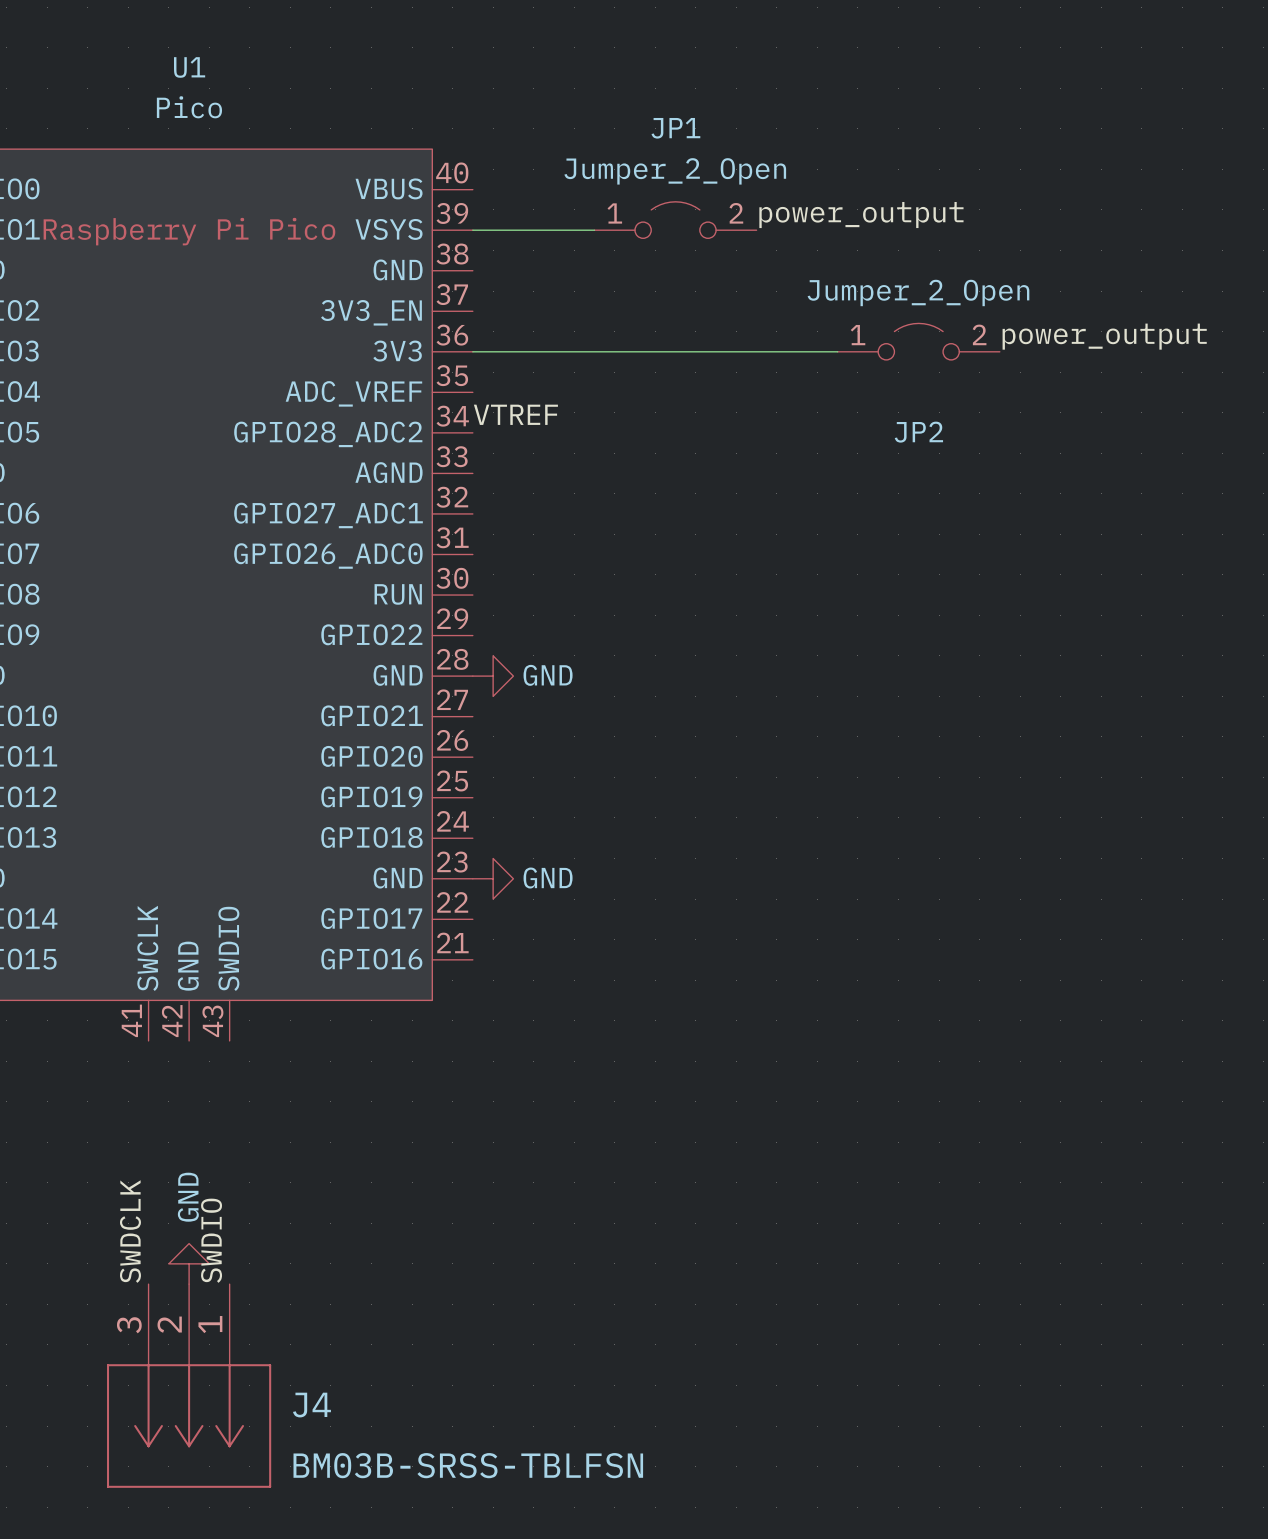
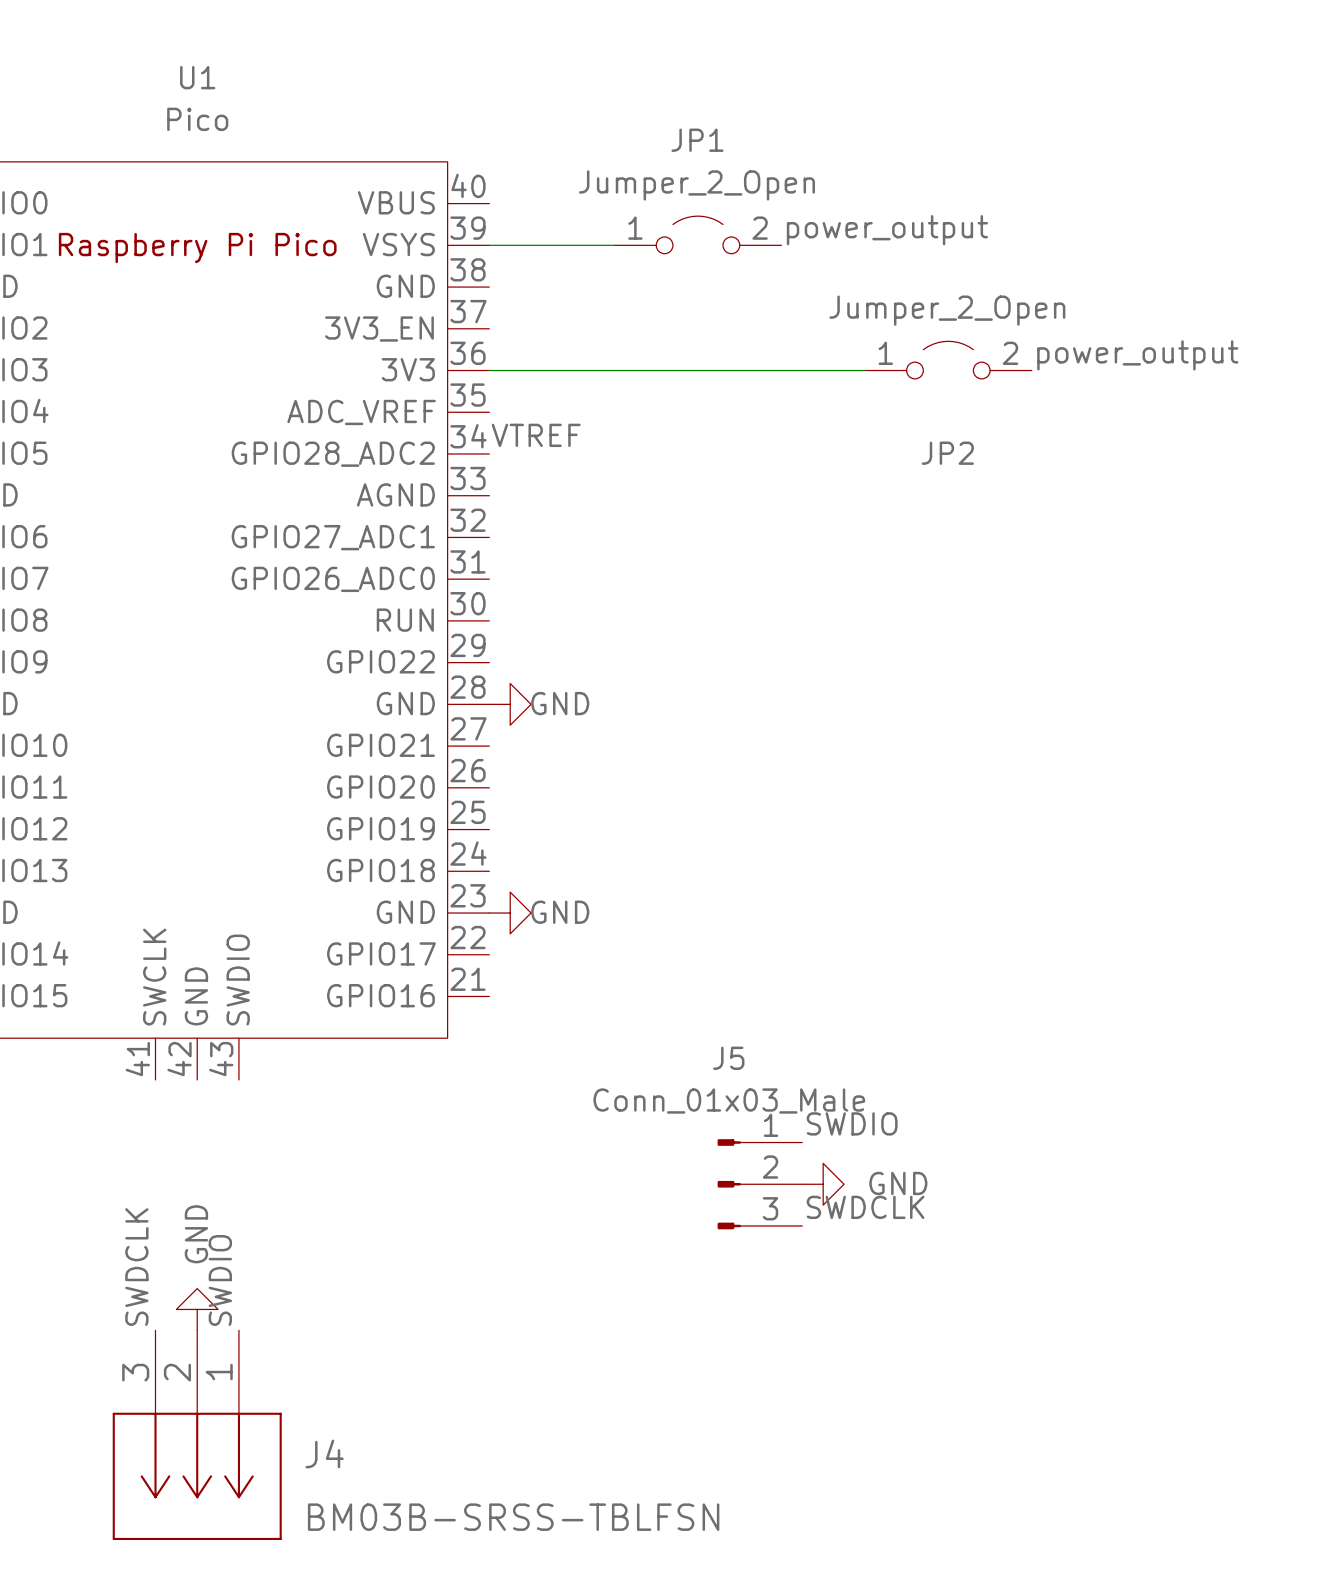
label: none -> SWDIO (852, 1123)
J5: none -> Conn_01x03_Male (759, 1184)
power symbol: none -> GND (823, 1184)
label: none -> SWDCLK (865, 1207)

